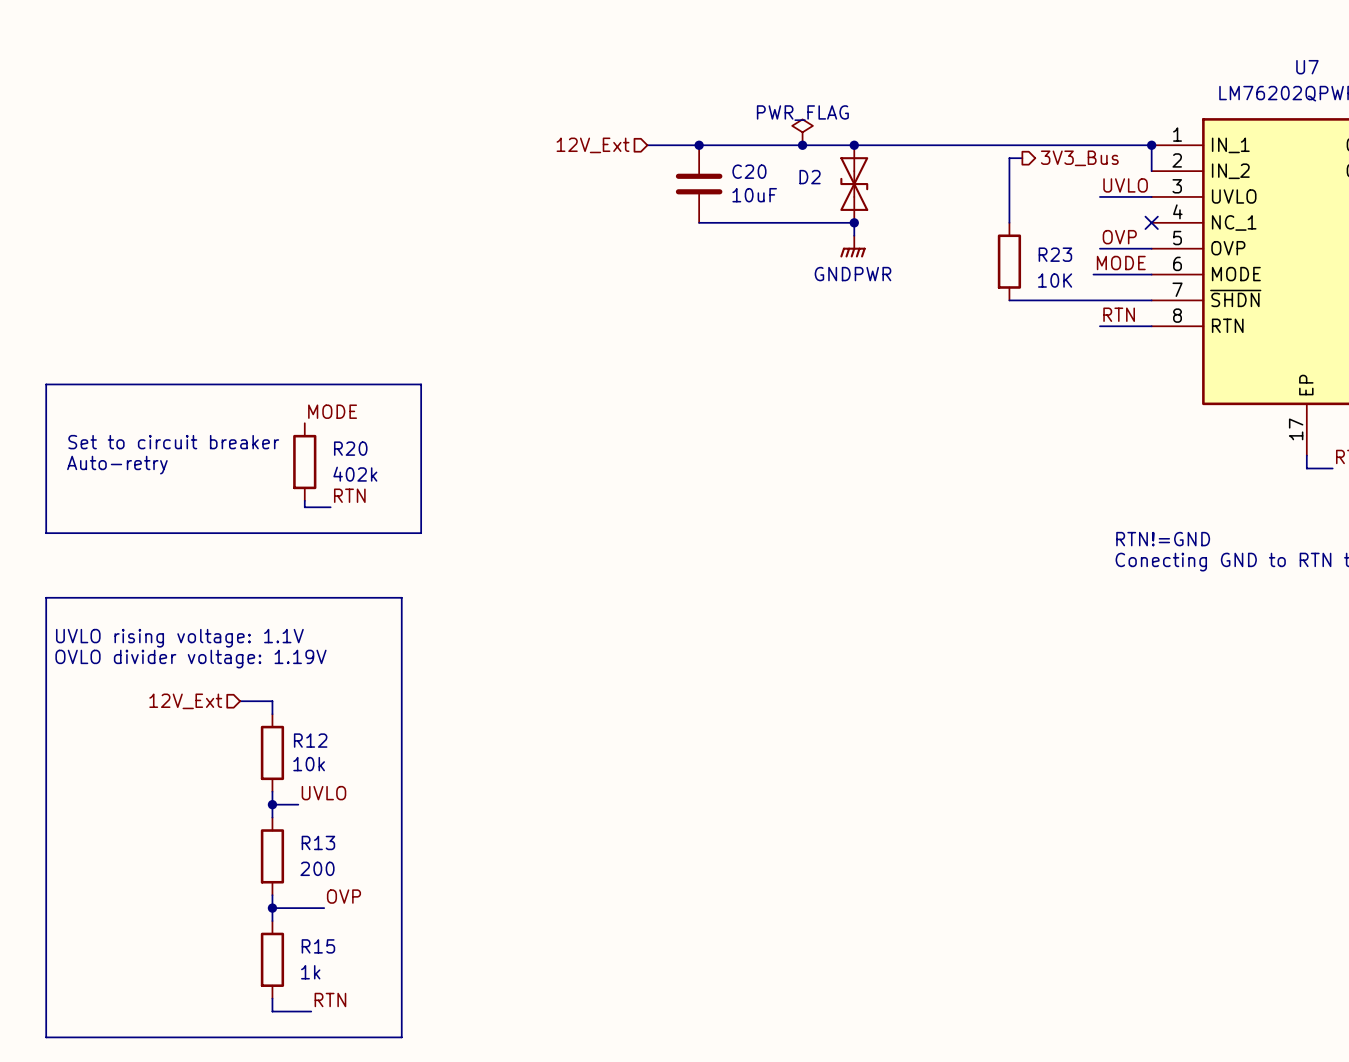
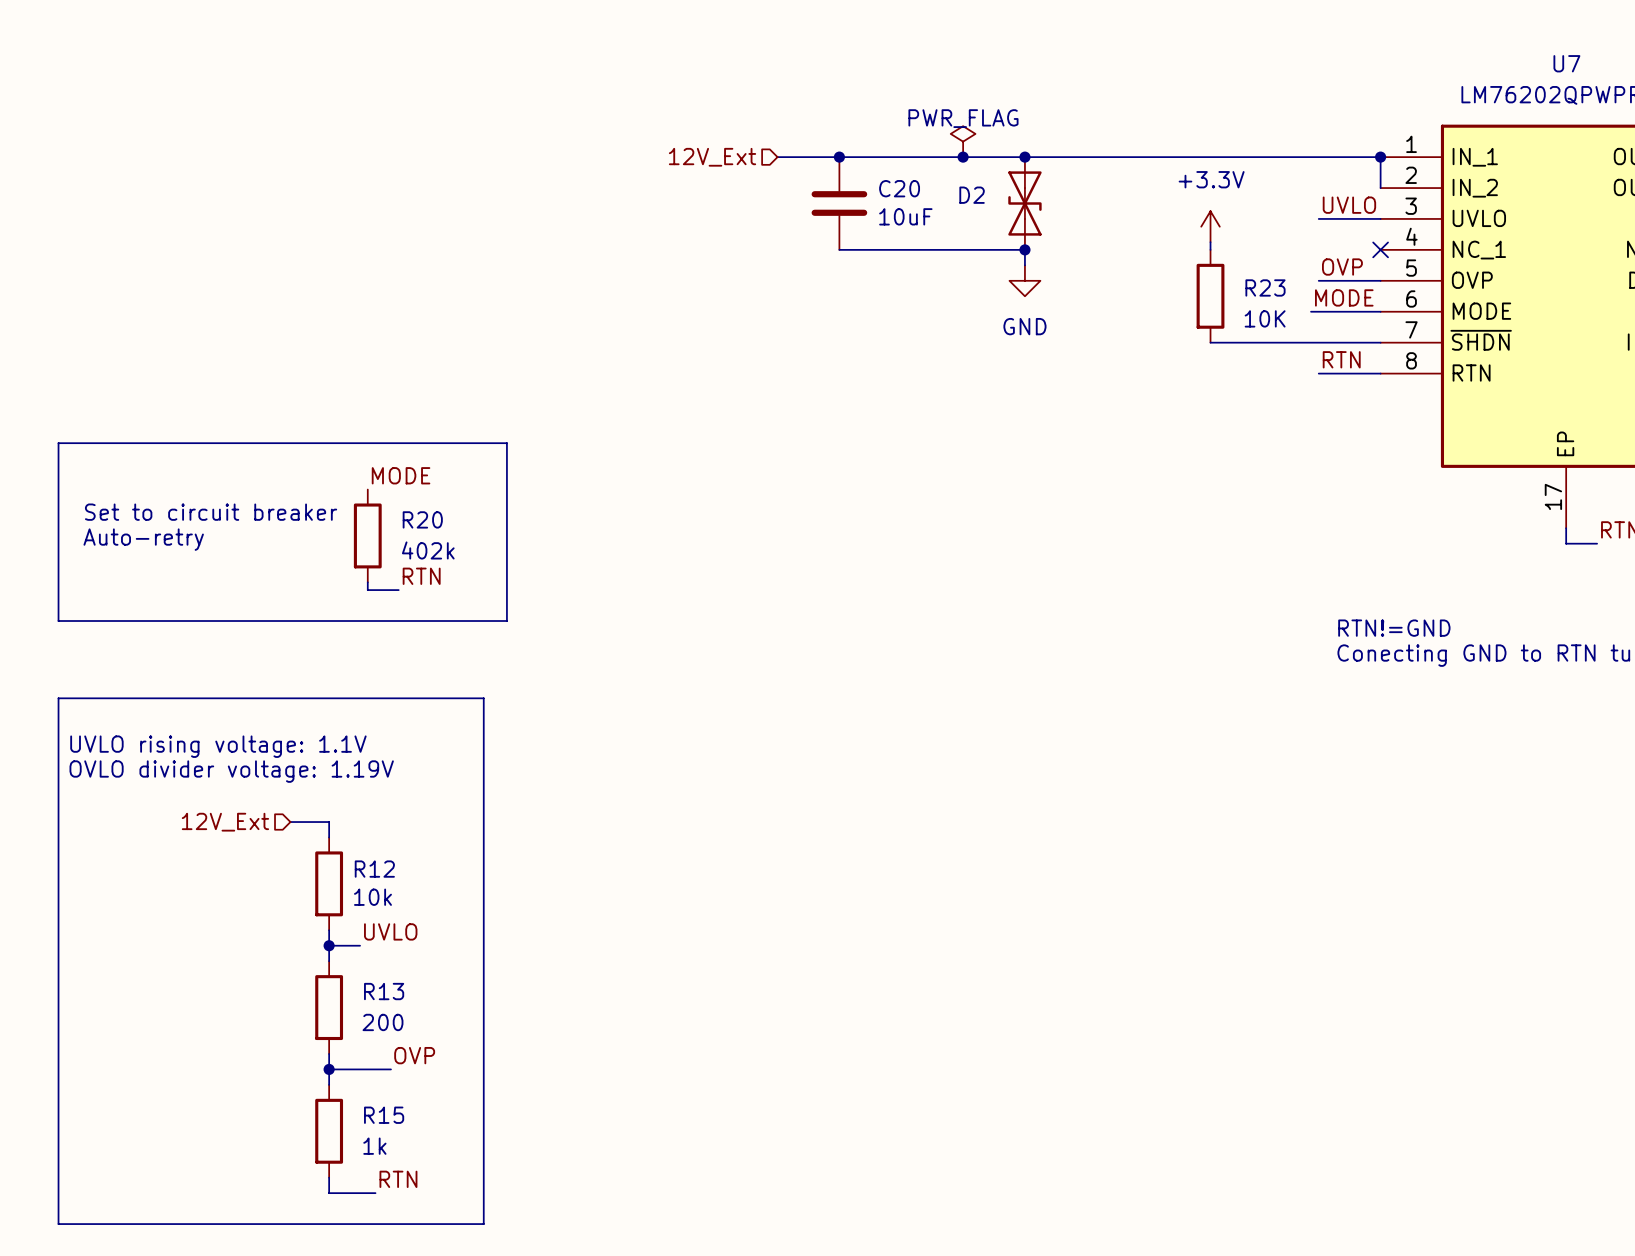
wire: (1022, 158) (1009, 158) (1009, 216) -> none
hierarchical label: 3V3_Bus (1079, 158) -> none
power symbol: none -> +3.3V (1210, 226)
power symbol: GNDPWR (852, 246) -> GND (1024, 280)

